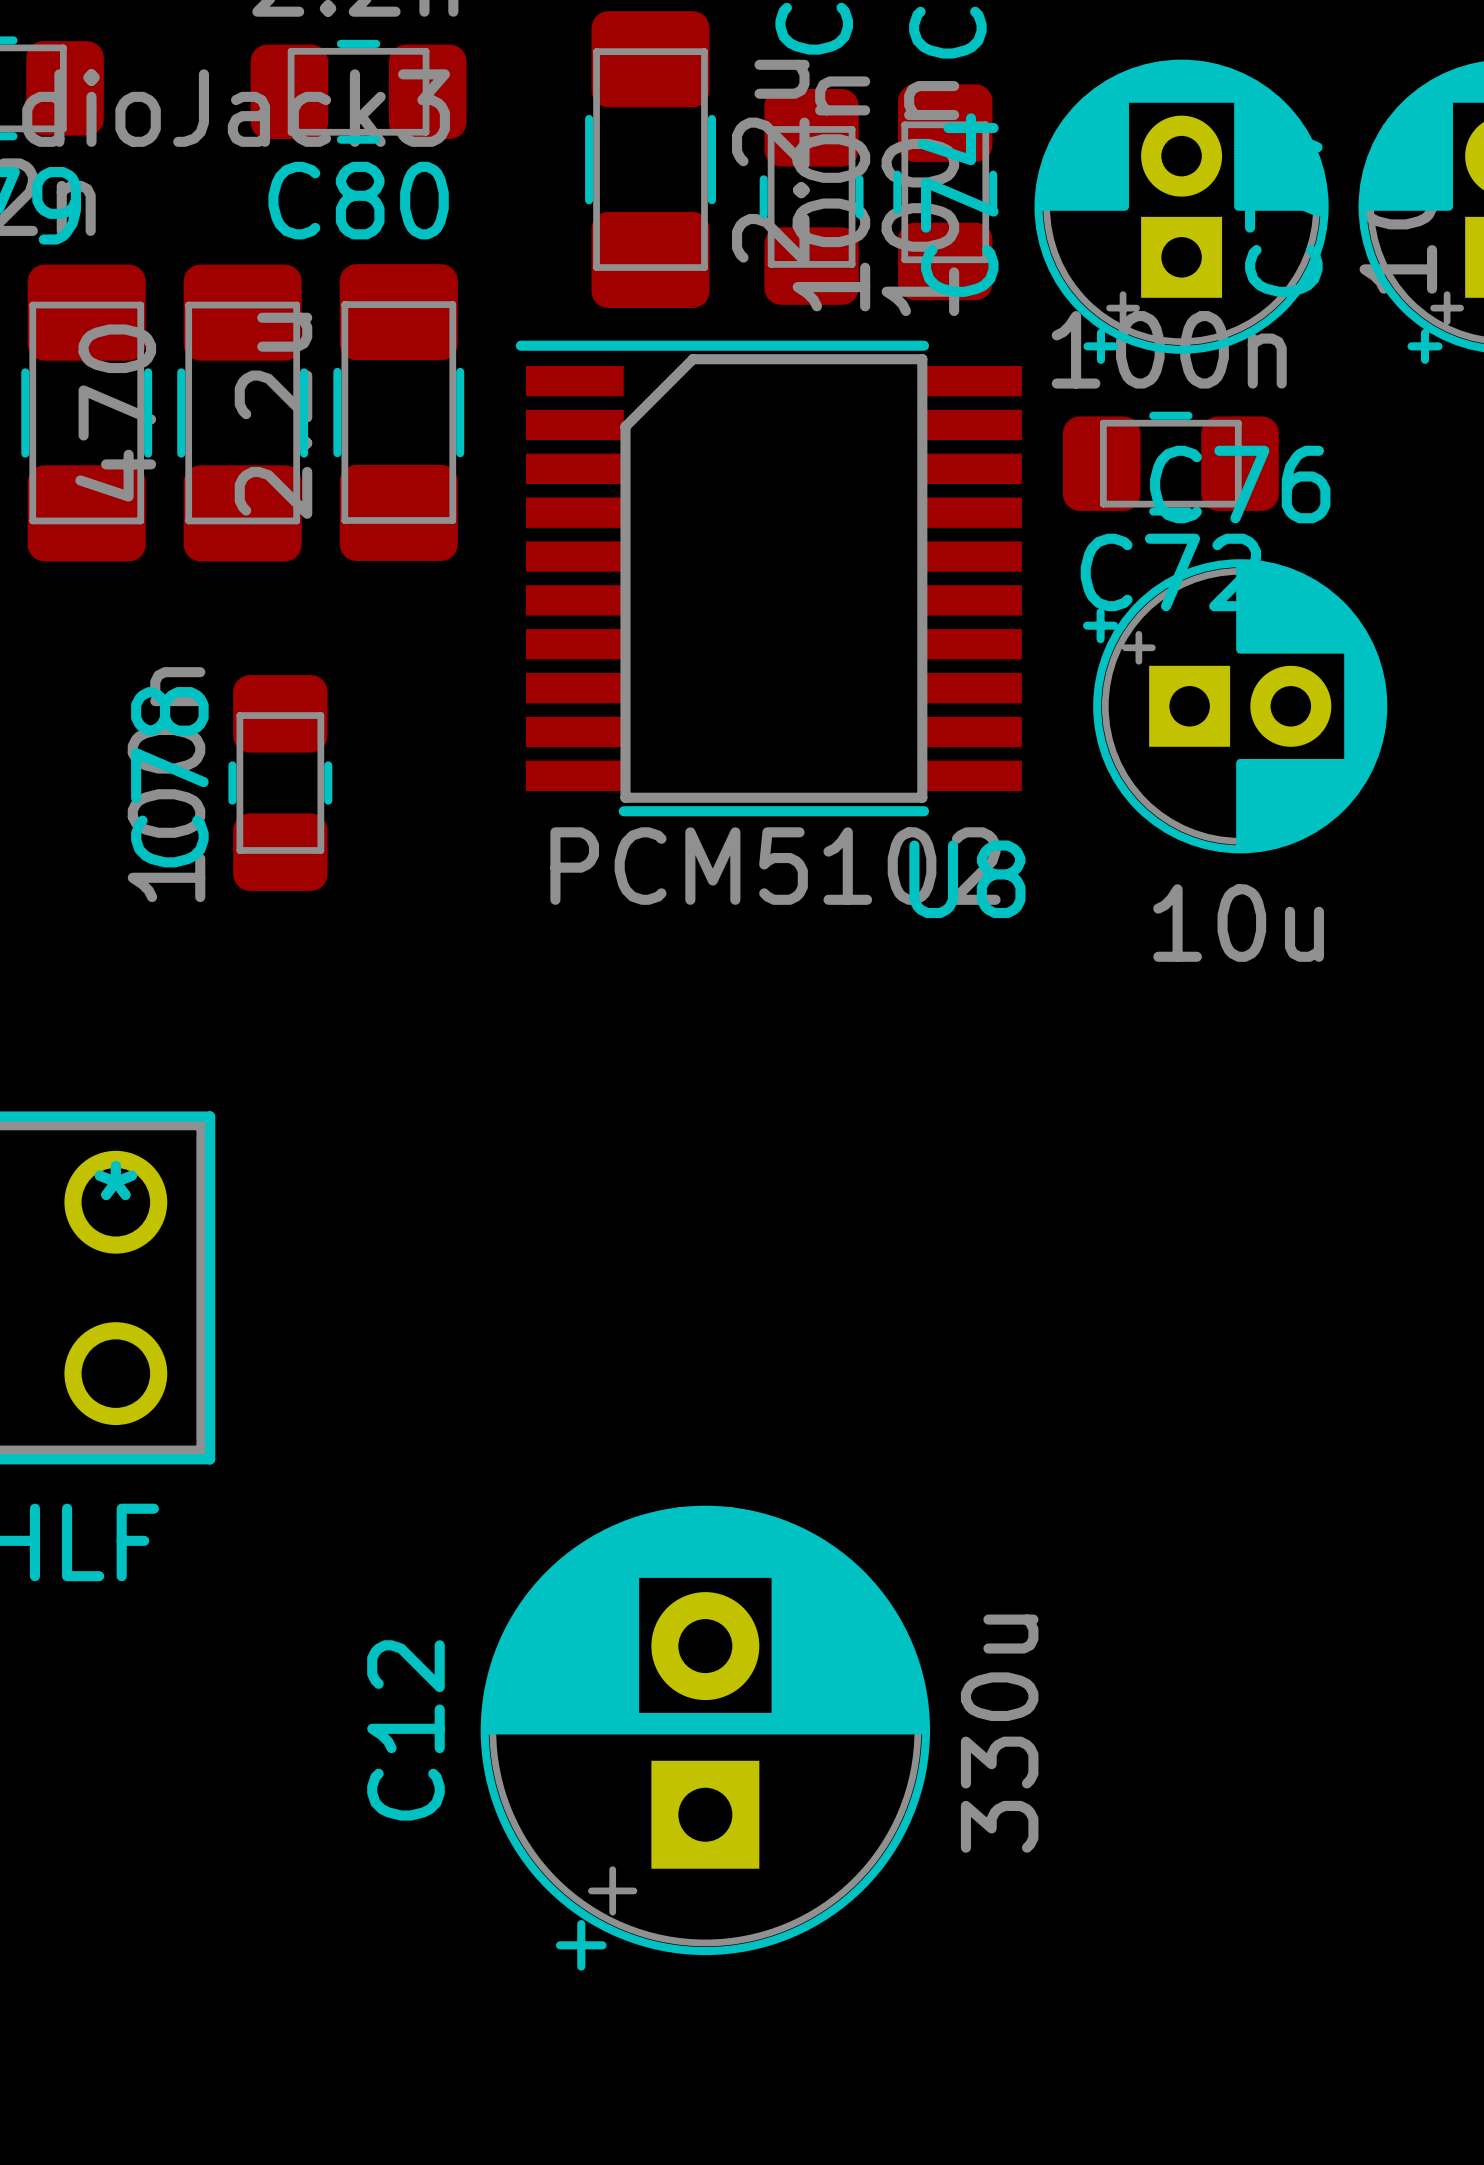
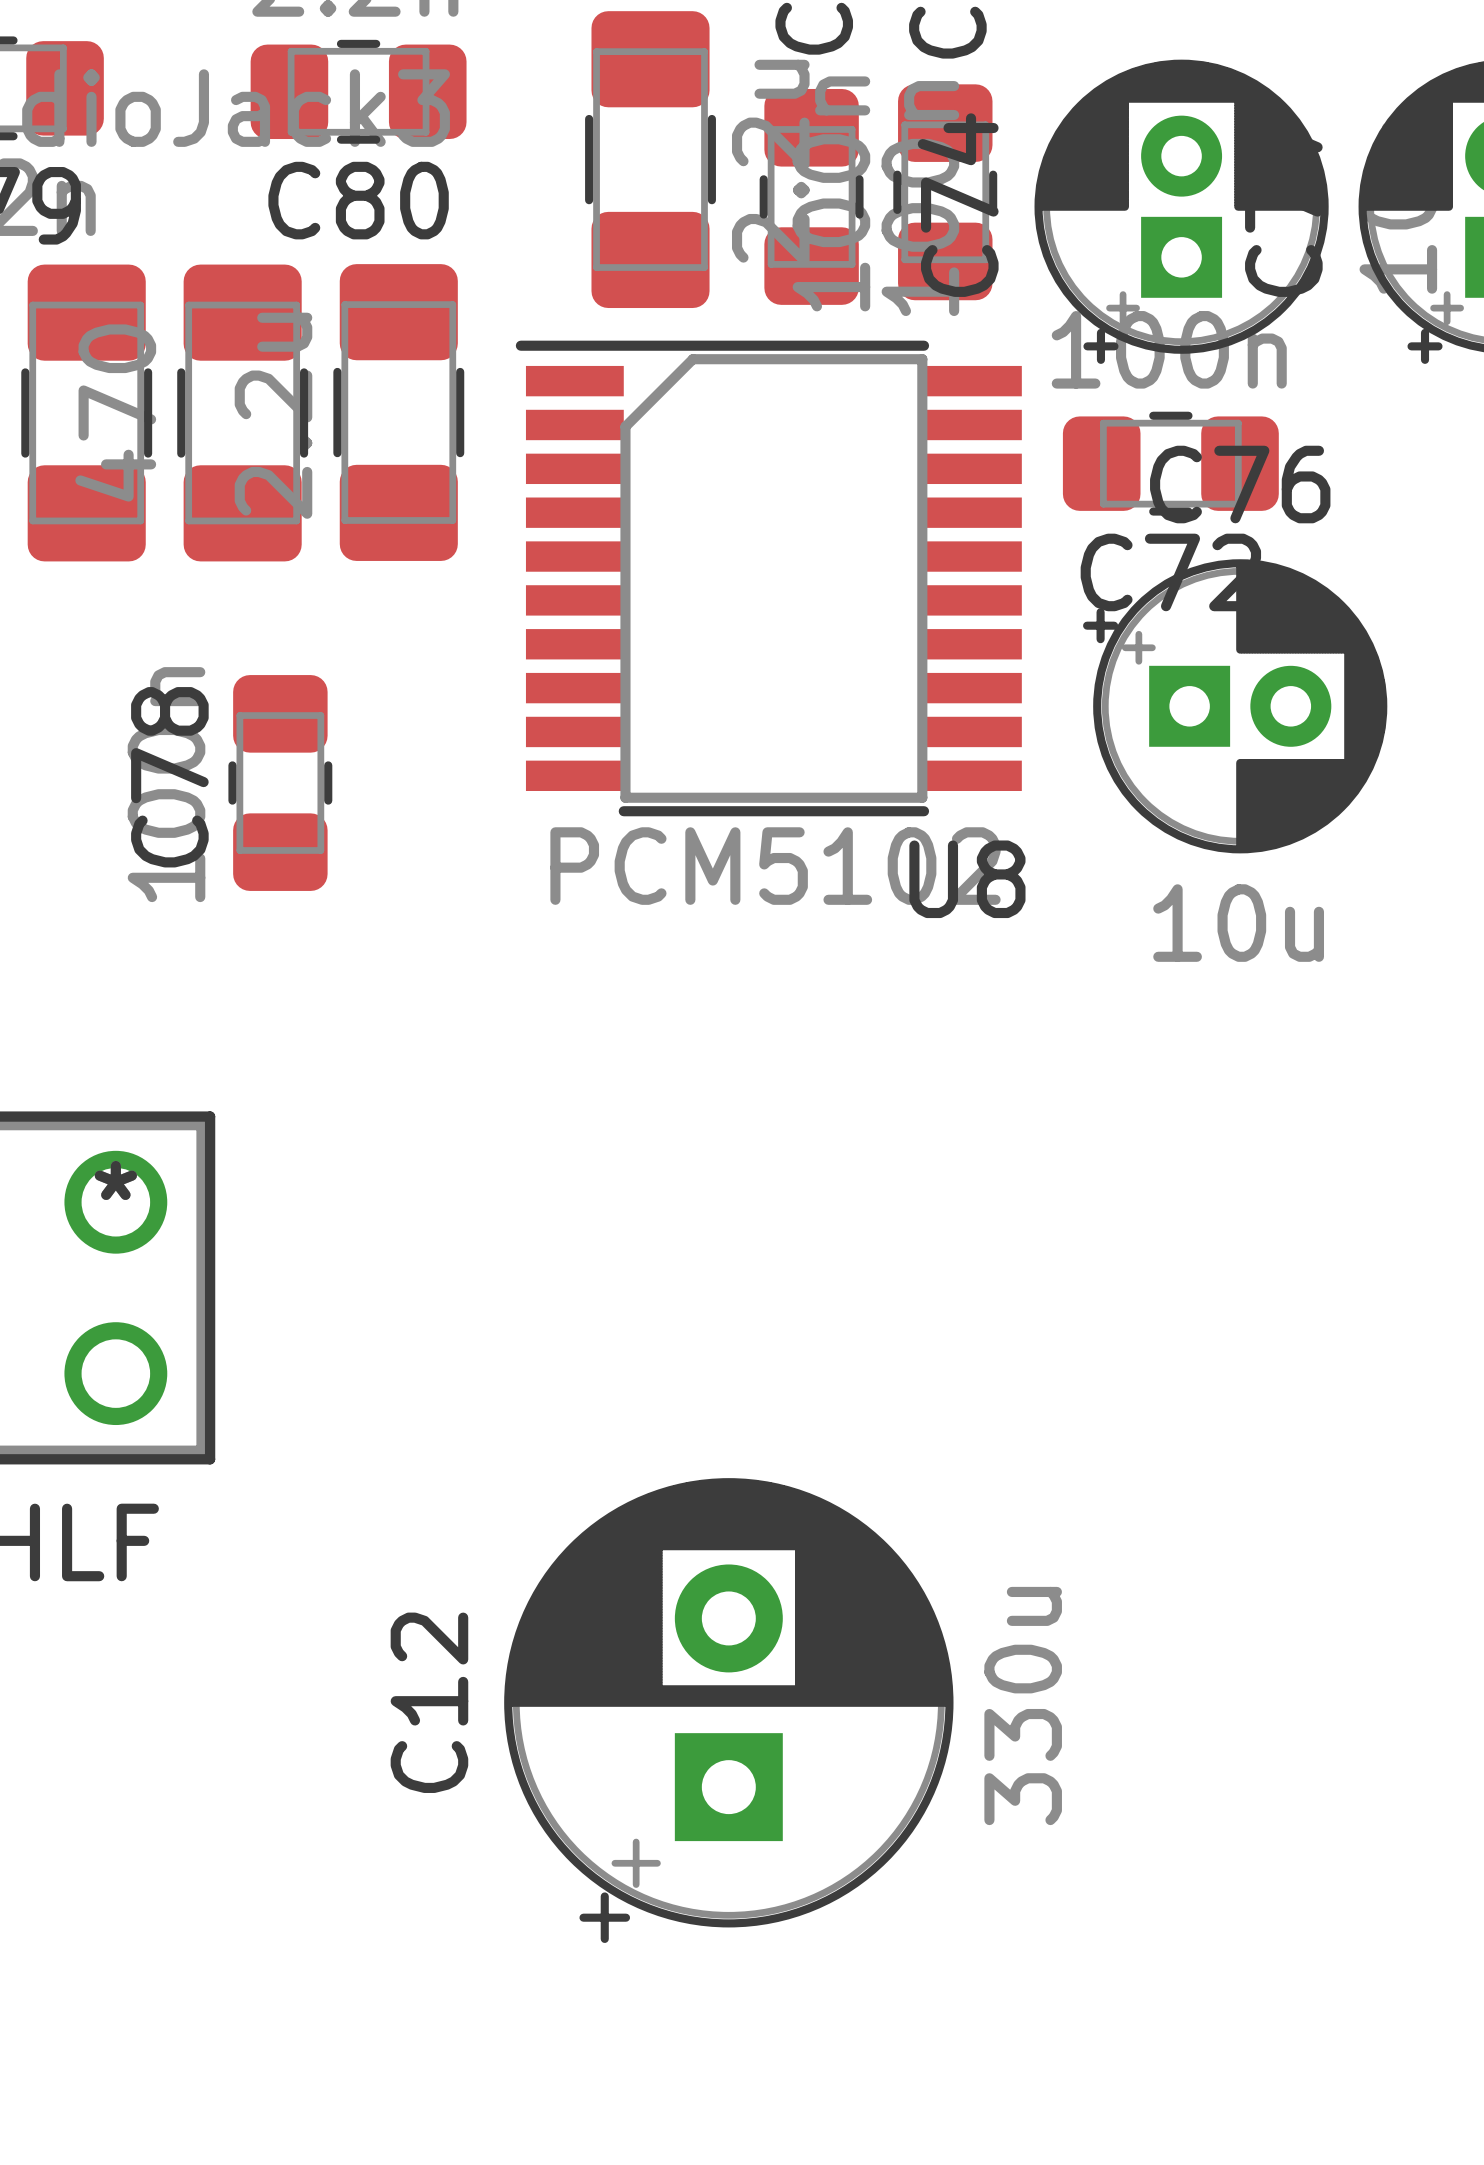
C12 position: (705, 1738) -> (728, 1710)

